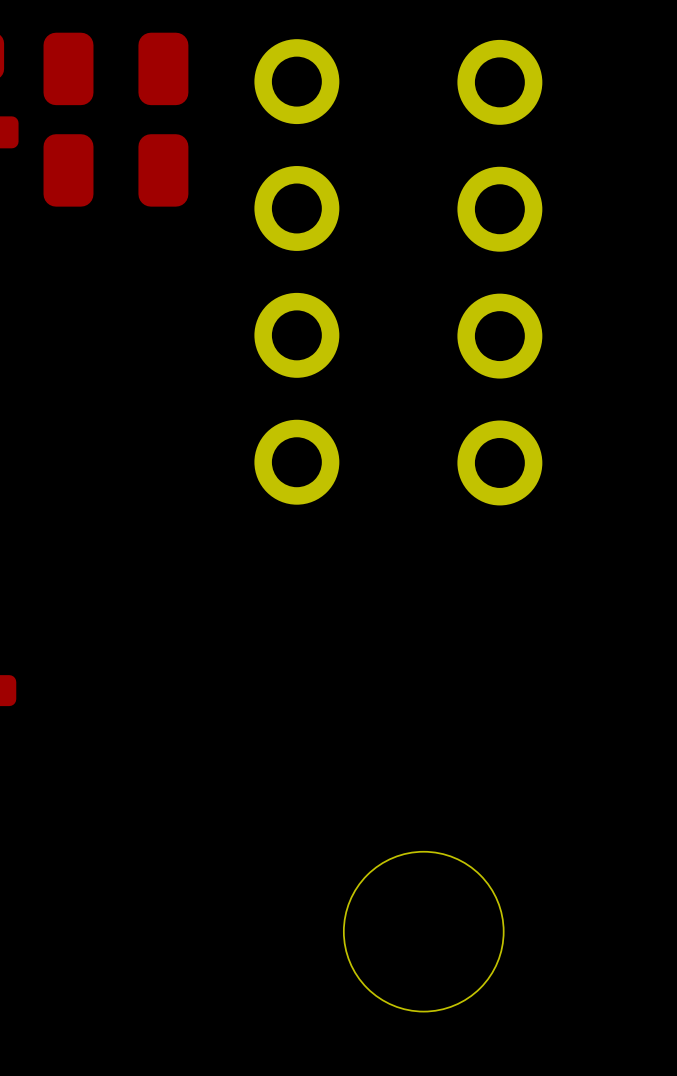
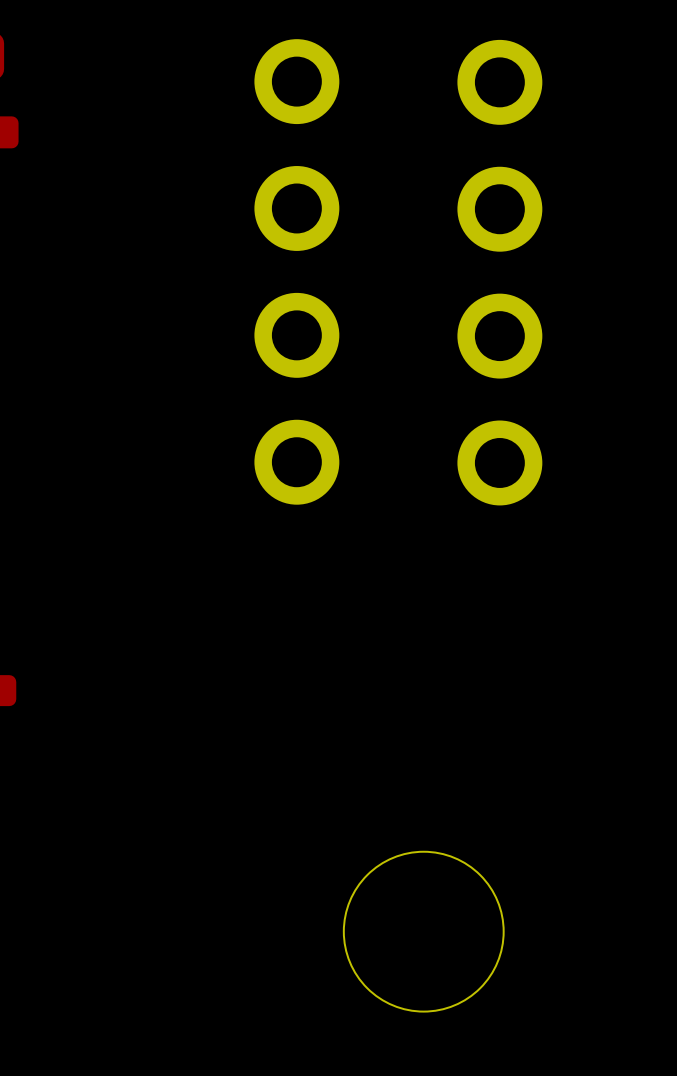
part: (115, 68) -> none
part: (115, 170) -> none

